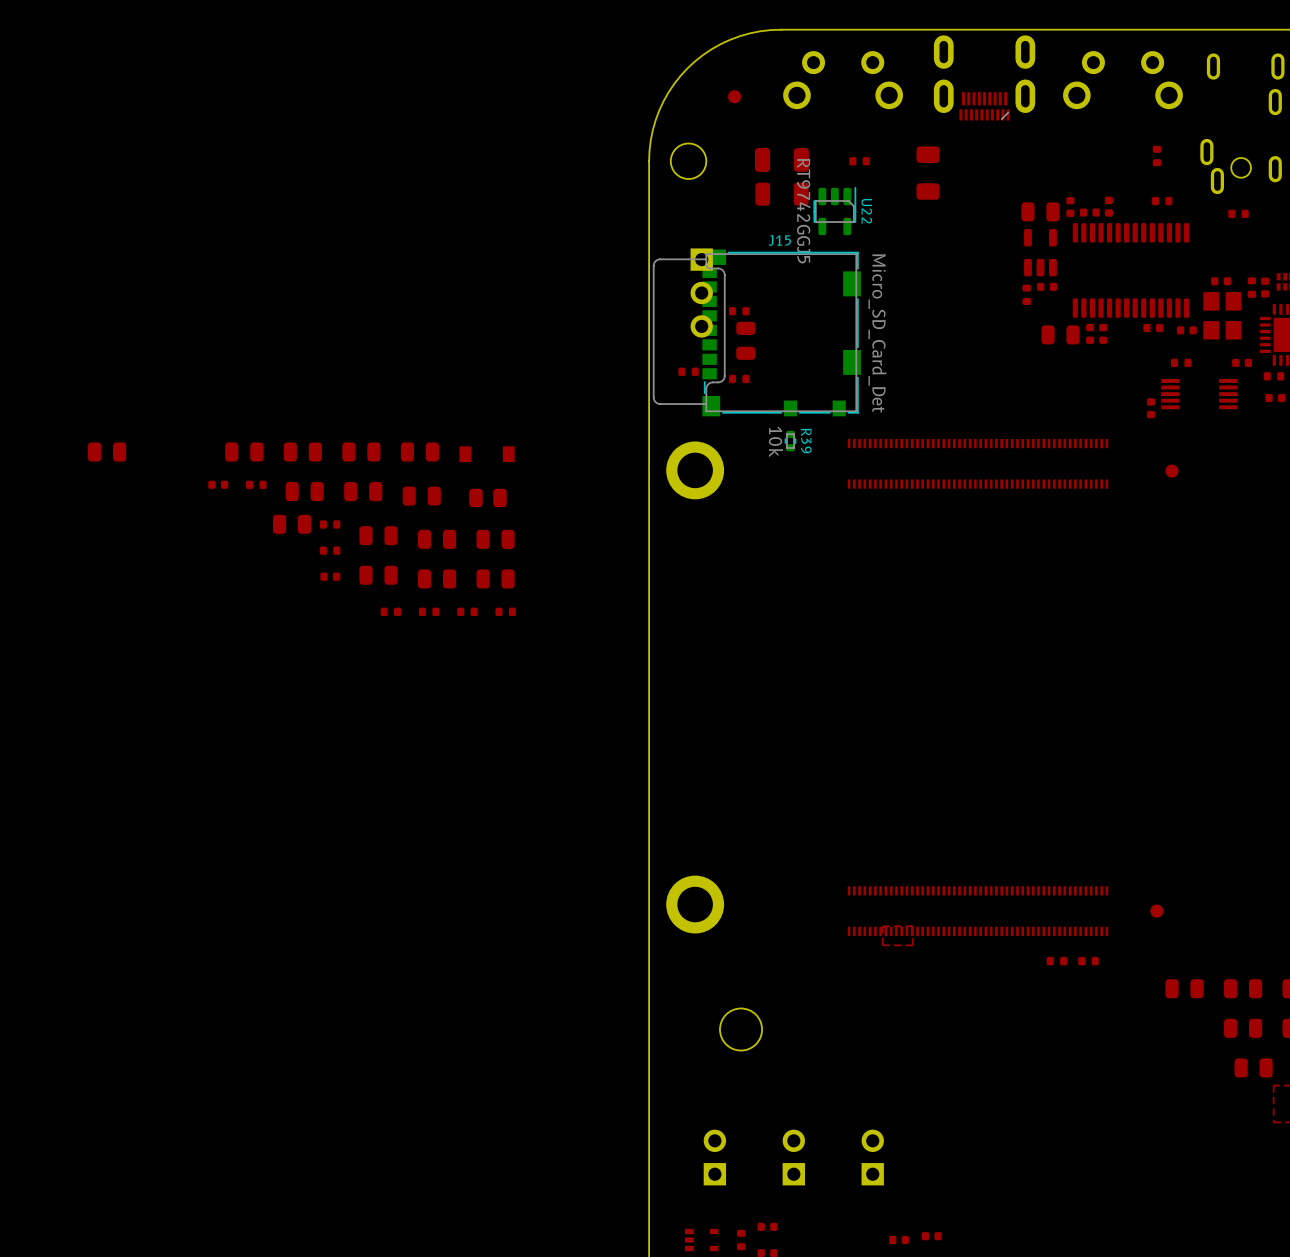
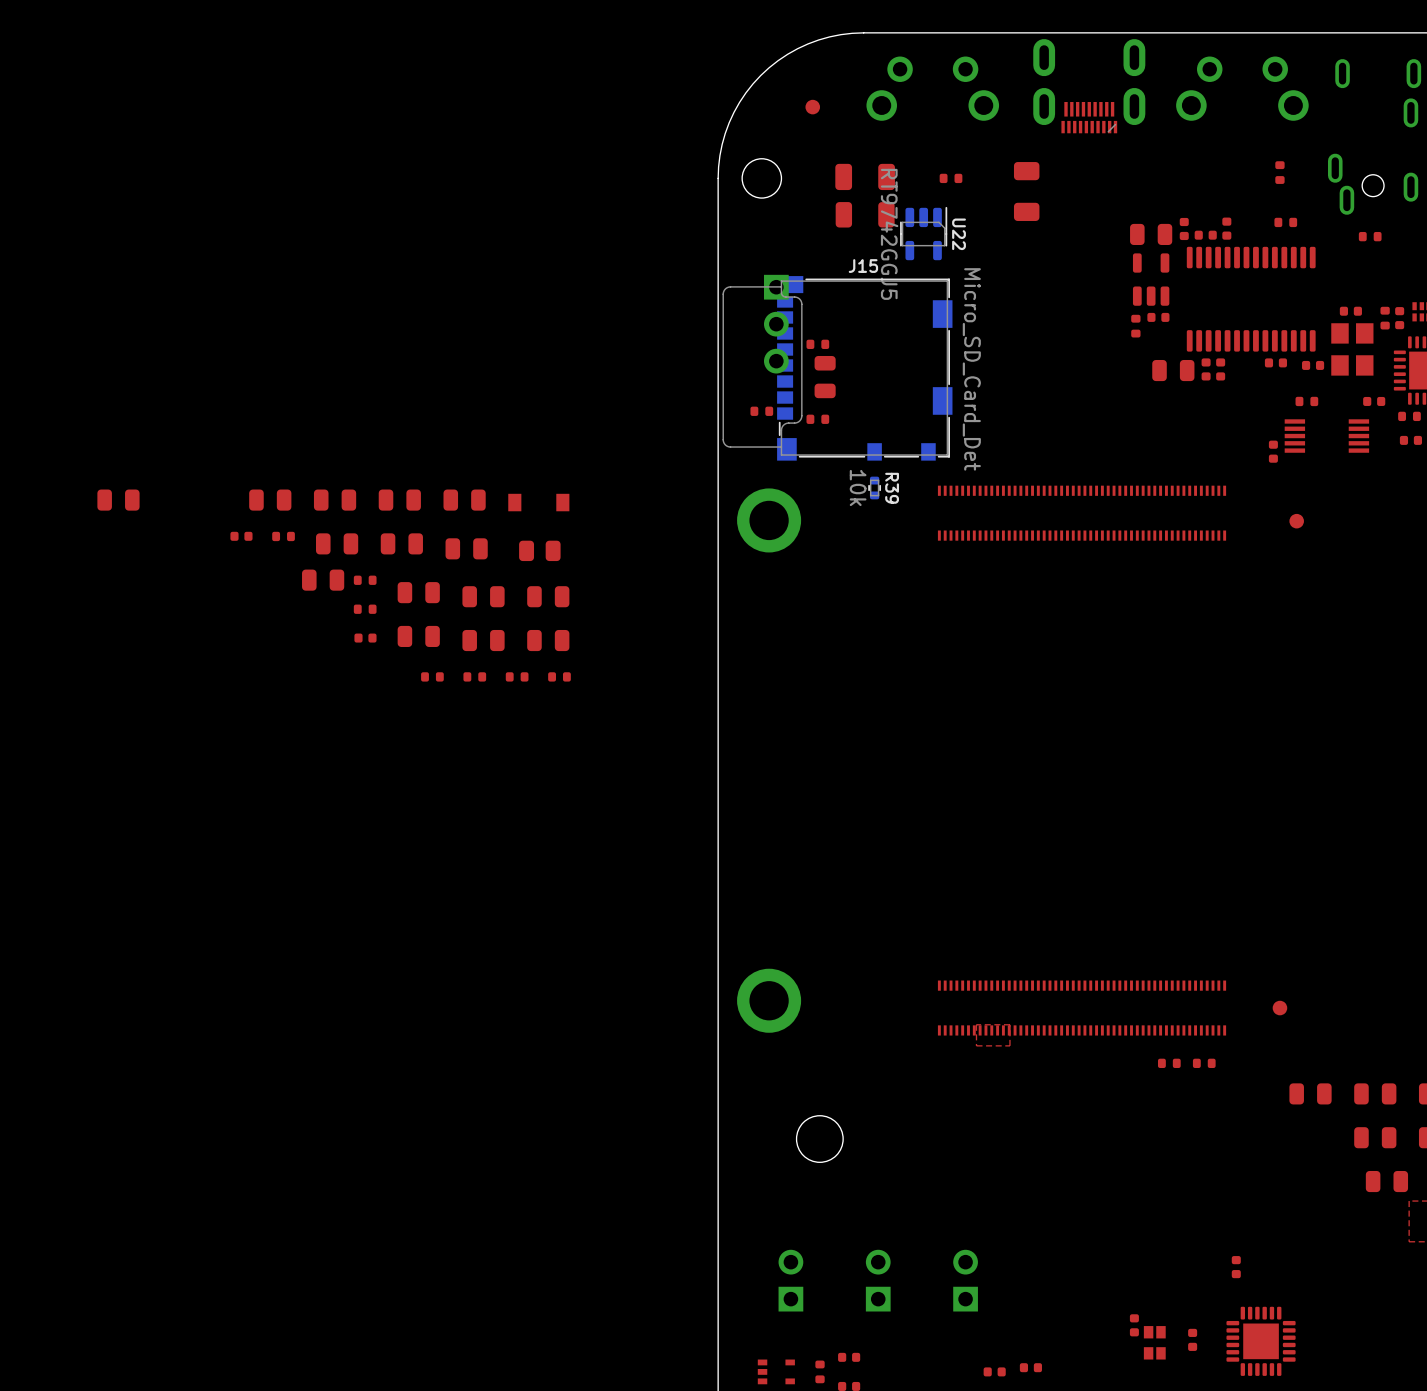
part: none -> (1236, 1267)
part: none -> (1134, 1325)
part: none -> (1192, 1339)
part: none -> (1261, 1341)
part: none -> (1154, 1342)

